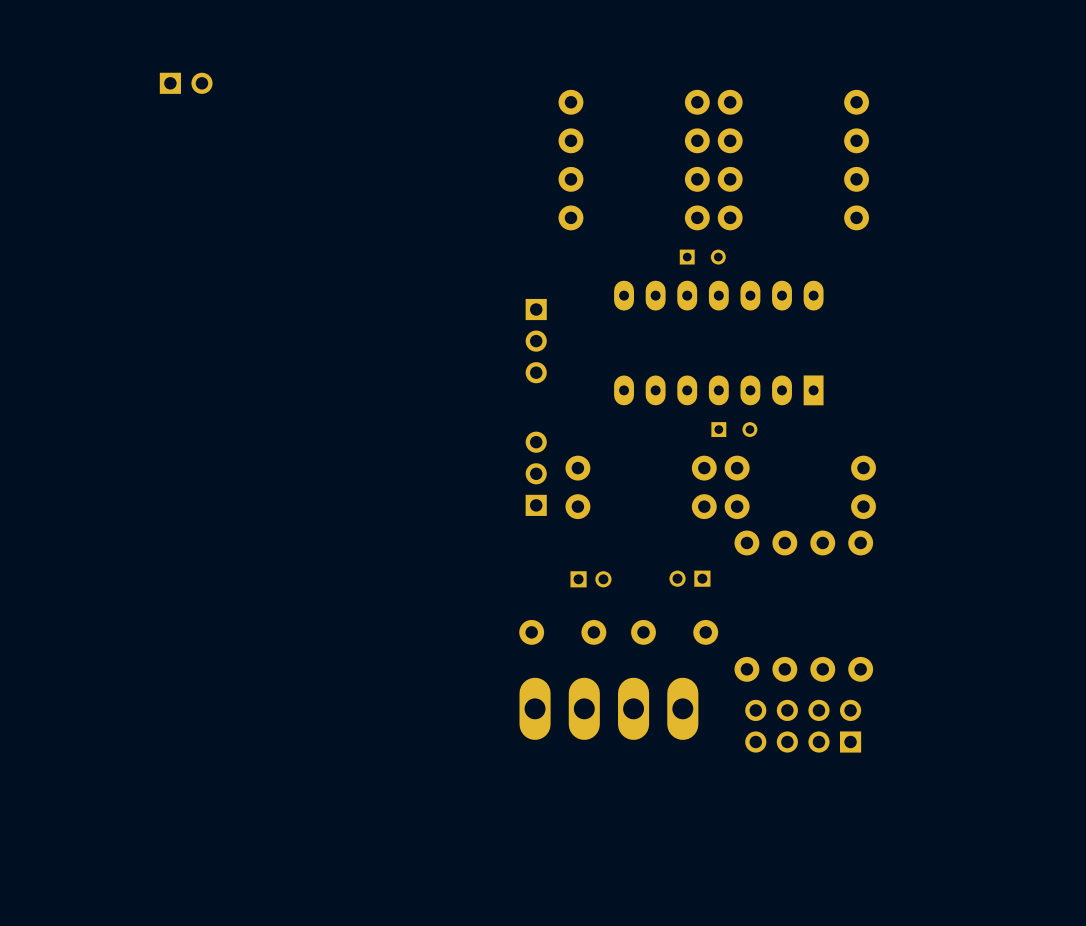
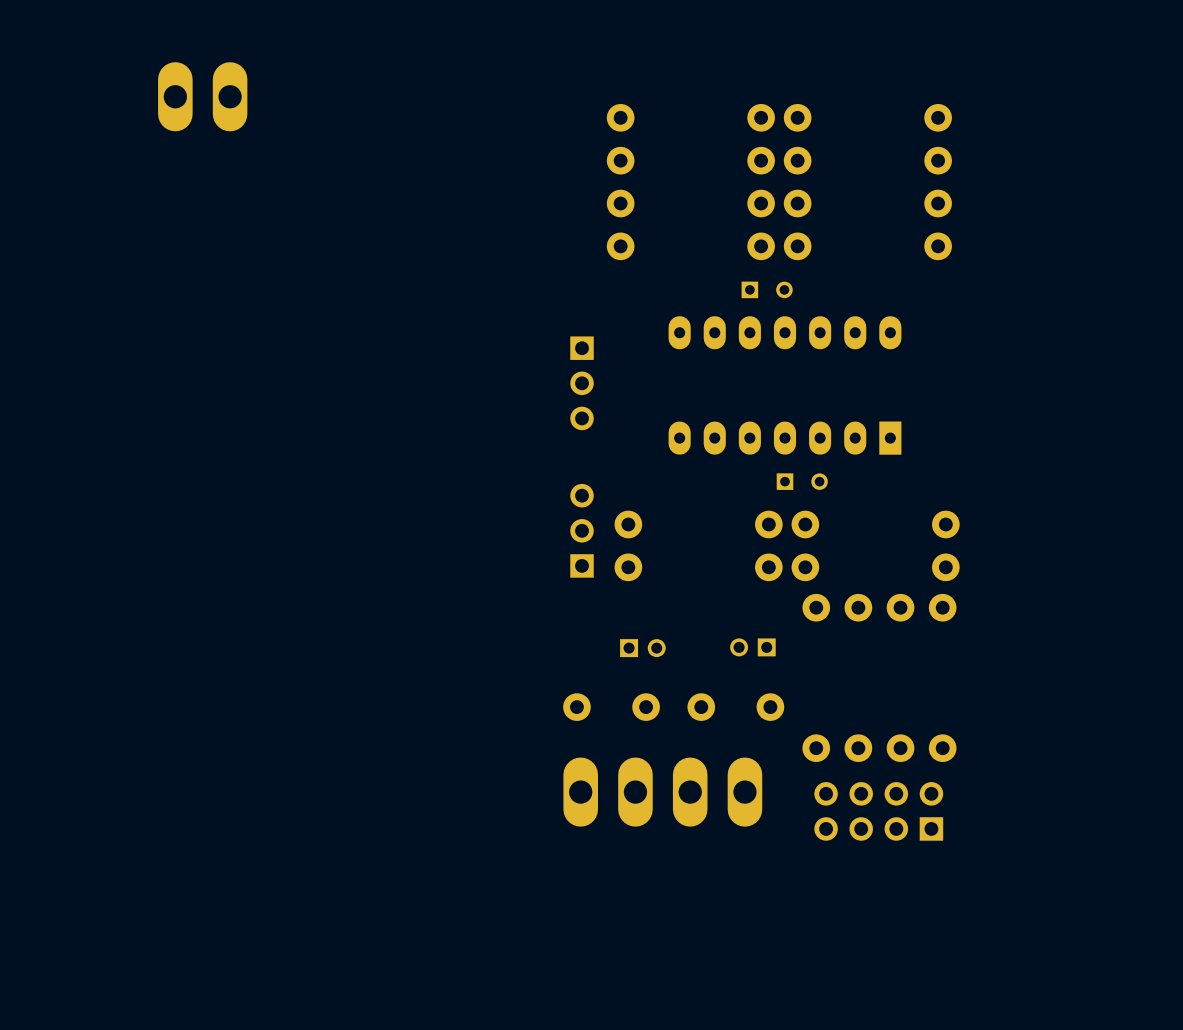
part footprint: [159, 72, 213, 94] -> [158, 62, 248, 132]

